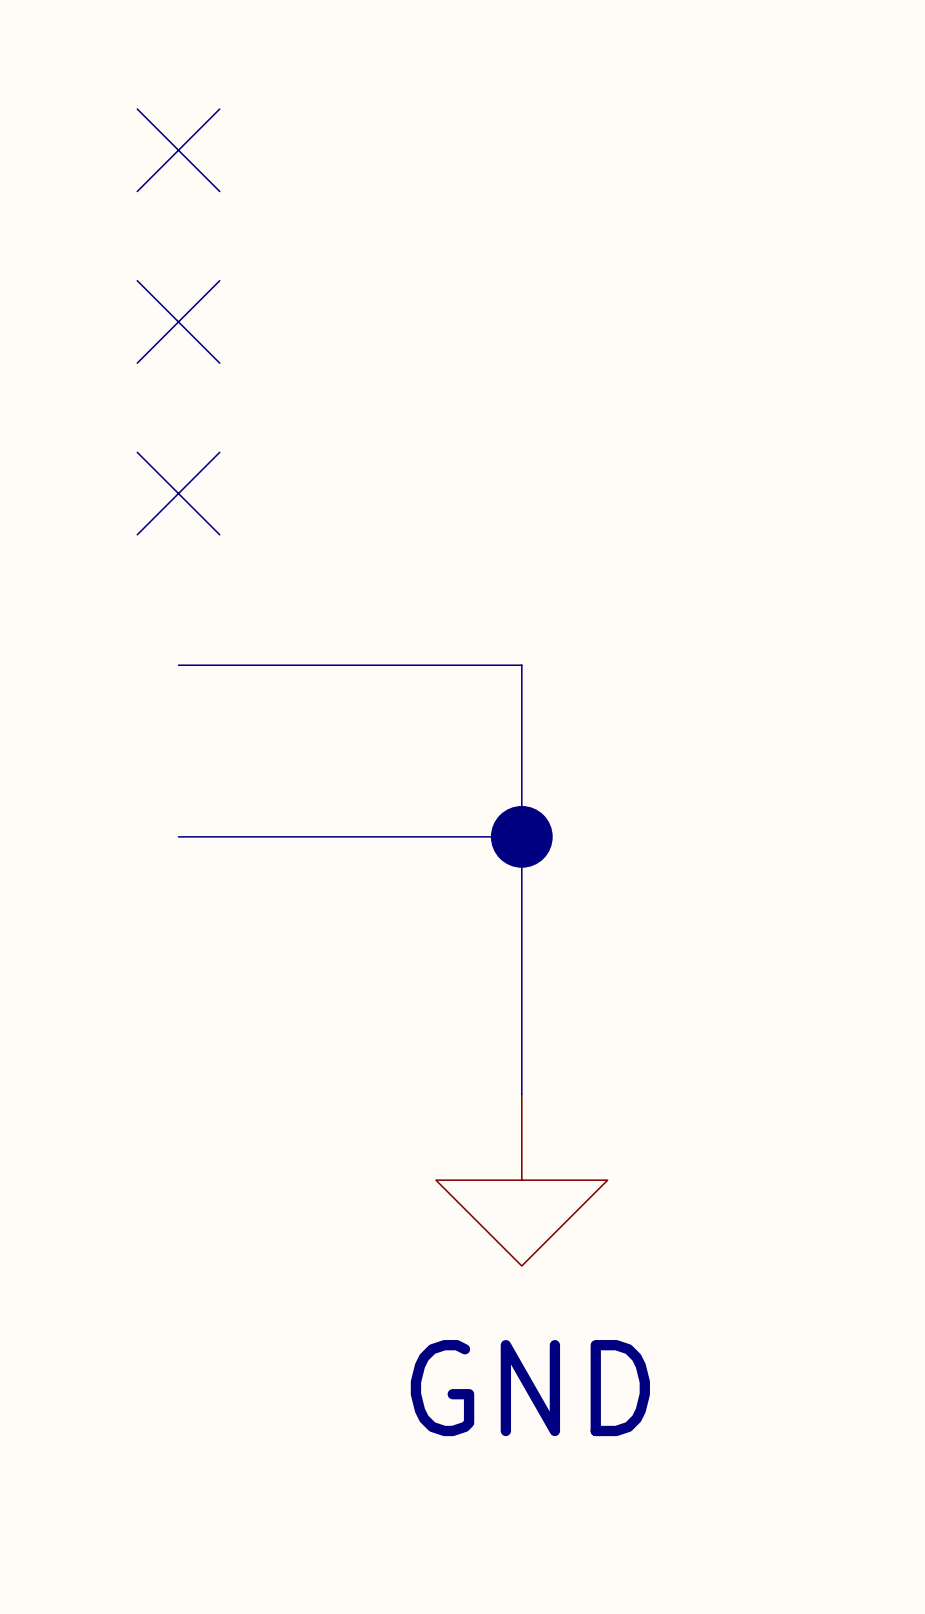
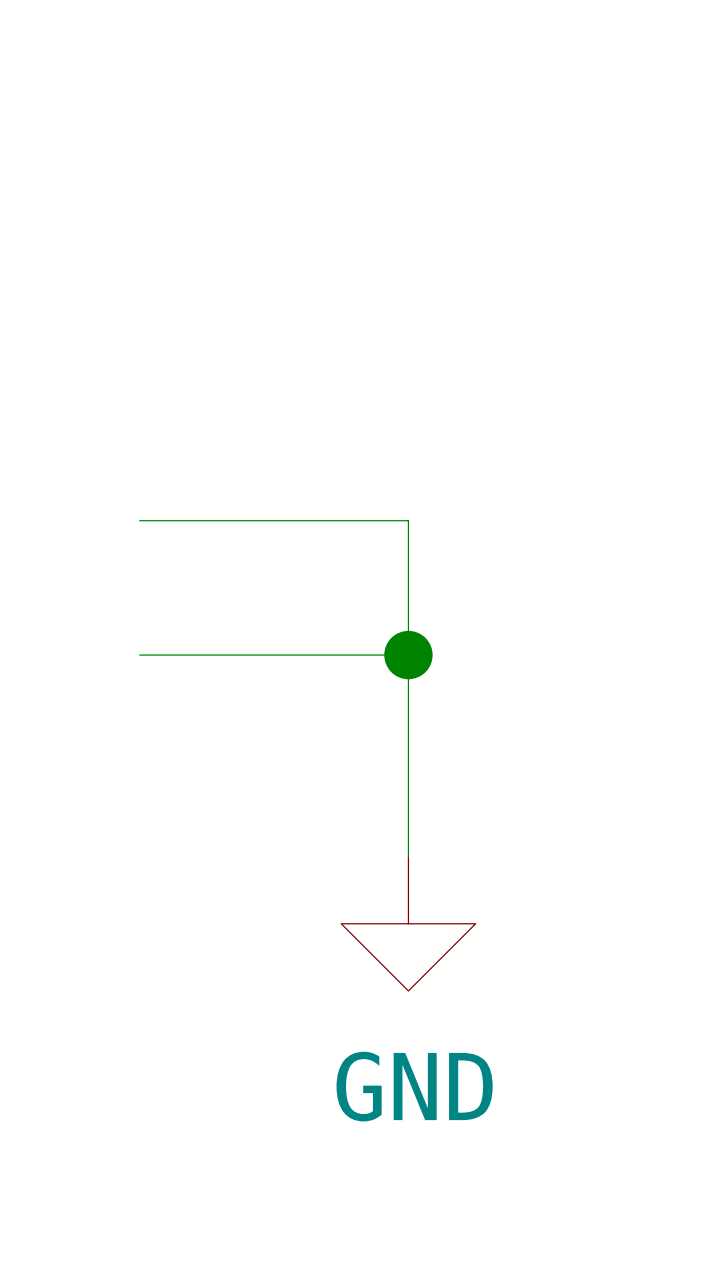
no-connect mark: (178, 150) -> none
no-connect mark: (178, 321) -> none
no-connect mark: (178, 493) -> none

